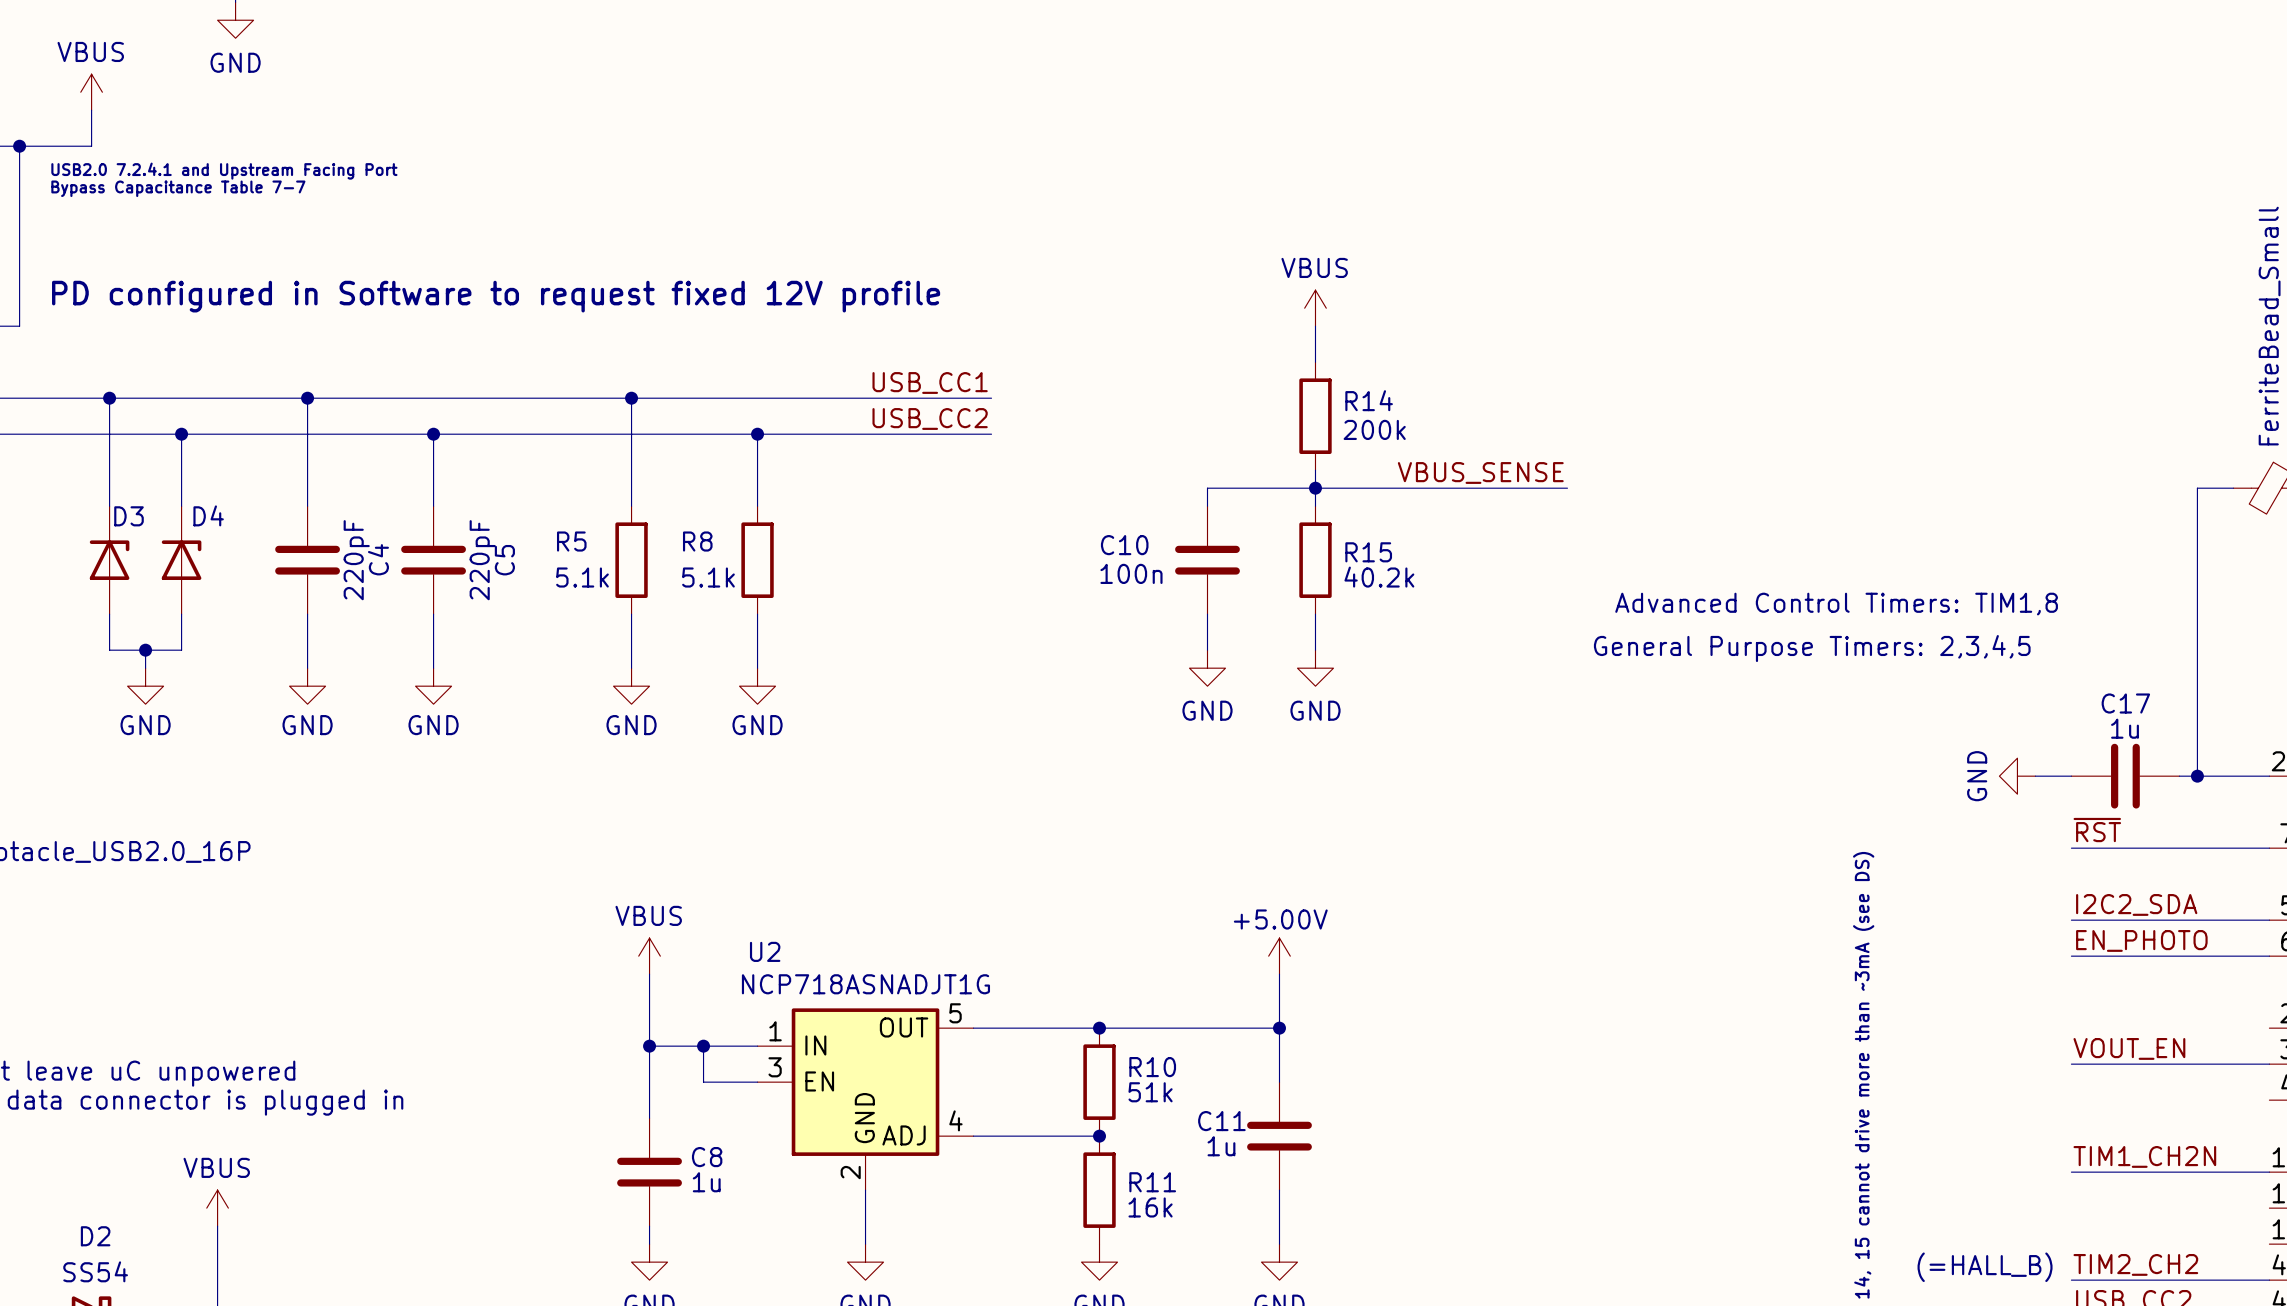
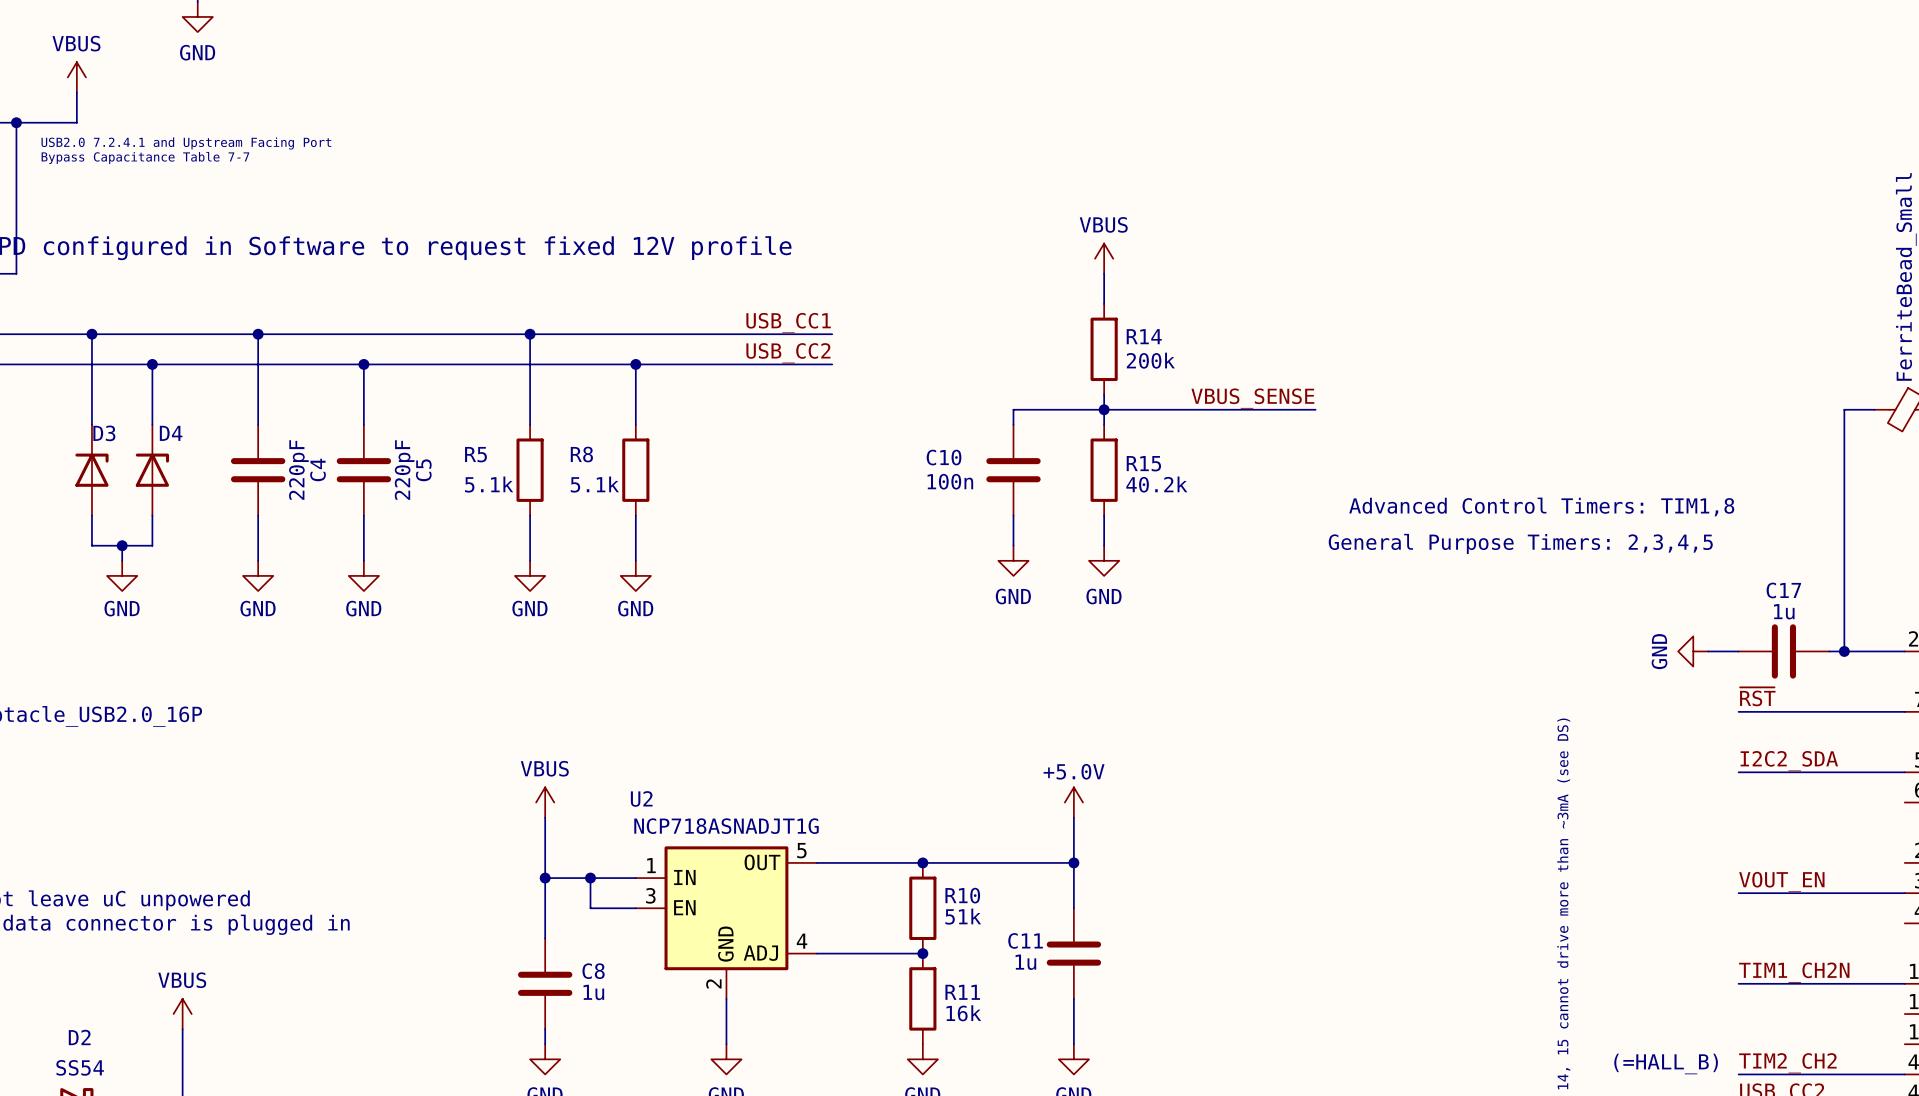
label: EN_PHOTO (2141, 940) -> none
power symbol: +5.00V (1279, 956) -> +5.0V (1073, 802)
wire: (2071, 956) (2269, 956) -> none

